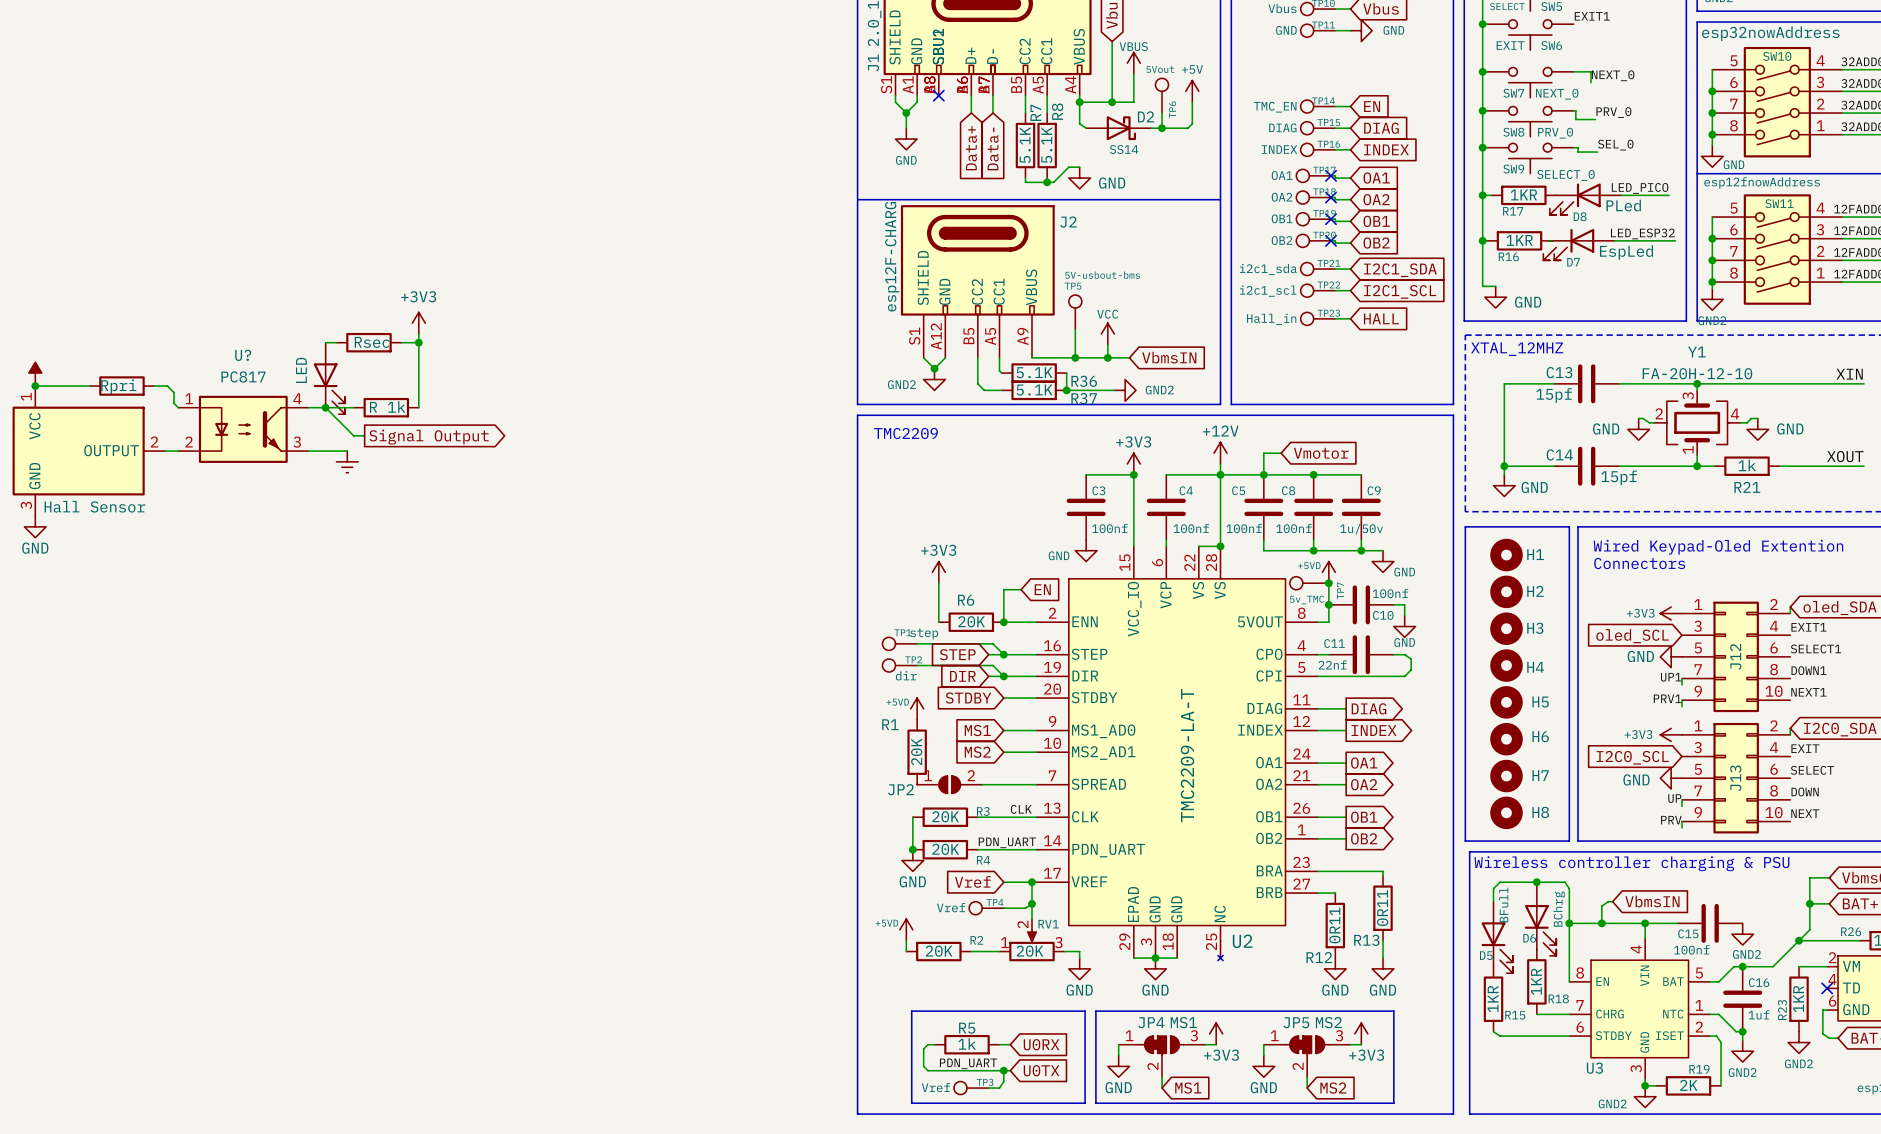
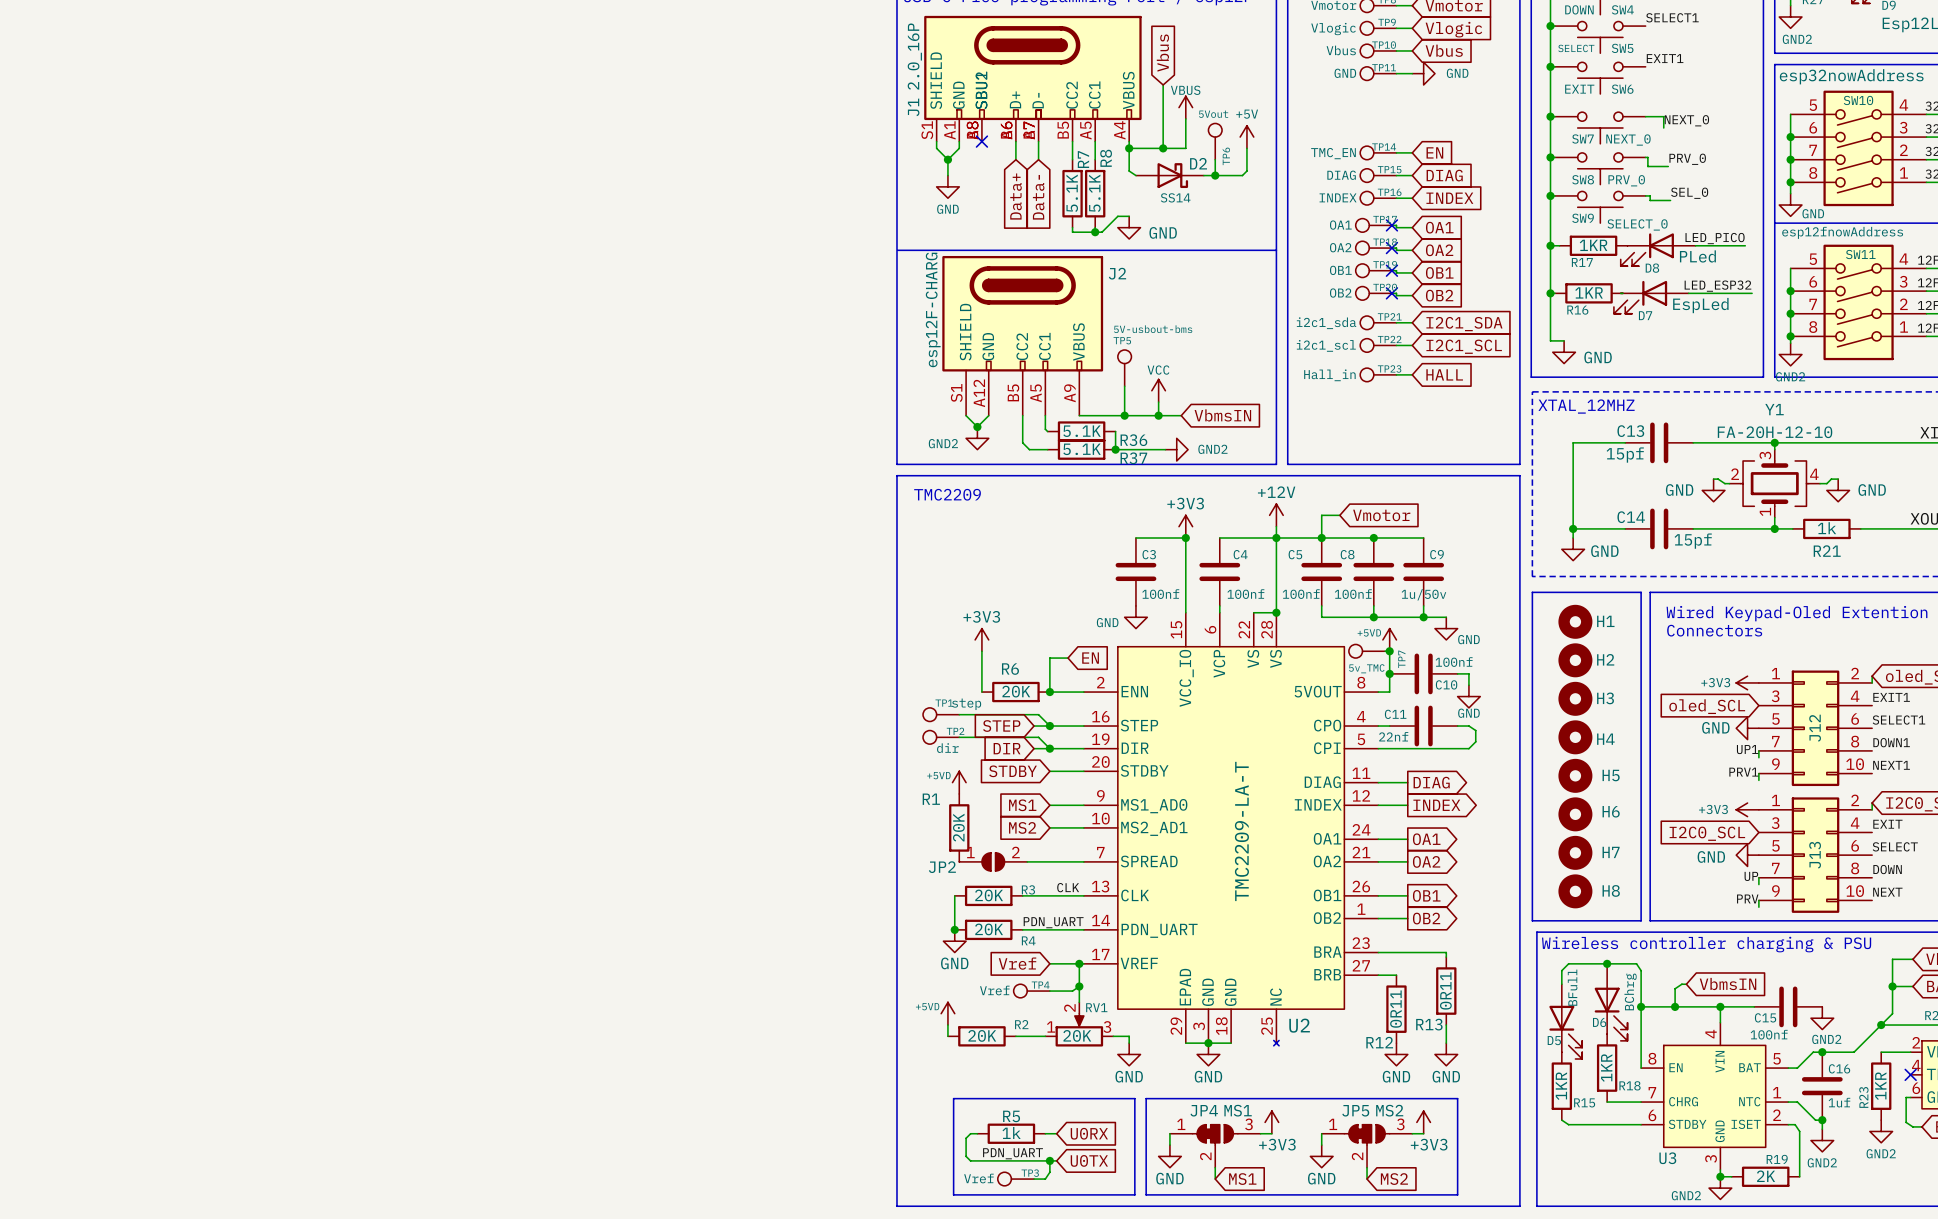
power symbol: +3V3 (418, 323) -> none
wire: (418, 334) (418, 407) -> none
wire: (325, 342) (336, 342) -> none
part: Rsec (368, 342) -> none
wire: (401, 342) (418, 342) -> none
junction: (418, 342) -> none
power symbol: (35, 373) -> none
part: LED (329, 378) -> none
wire: (35, 383) (35, 386) (89, 386) -> none
junction: (35, 386) -> none
part: Rpri (121, 386) -> none
wire: (154, 386) (167, 386) (173, 392) (173, 403) (178, 407) -> none
wire: (308, 407) (353, 407) -> none
wire: (325, 407) (353, 435) (364, 435) -> none
junction: (325, 407) -> none
part: R 1k (386, 407) -> none
U?: PC817 (243, 429) -> none
global label: Signal Output (429, 437) -> none
part: Hall Sensor (88, 451) -> none
wire: (165, 451) (178, 451) -> none
wire: (308, 451) (347, 451) -> none
power symbol: (347, 461) -> none
power symbol: GND (35, 526) -> none

